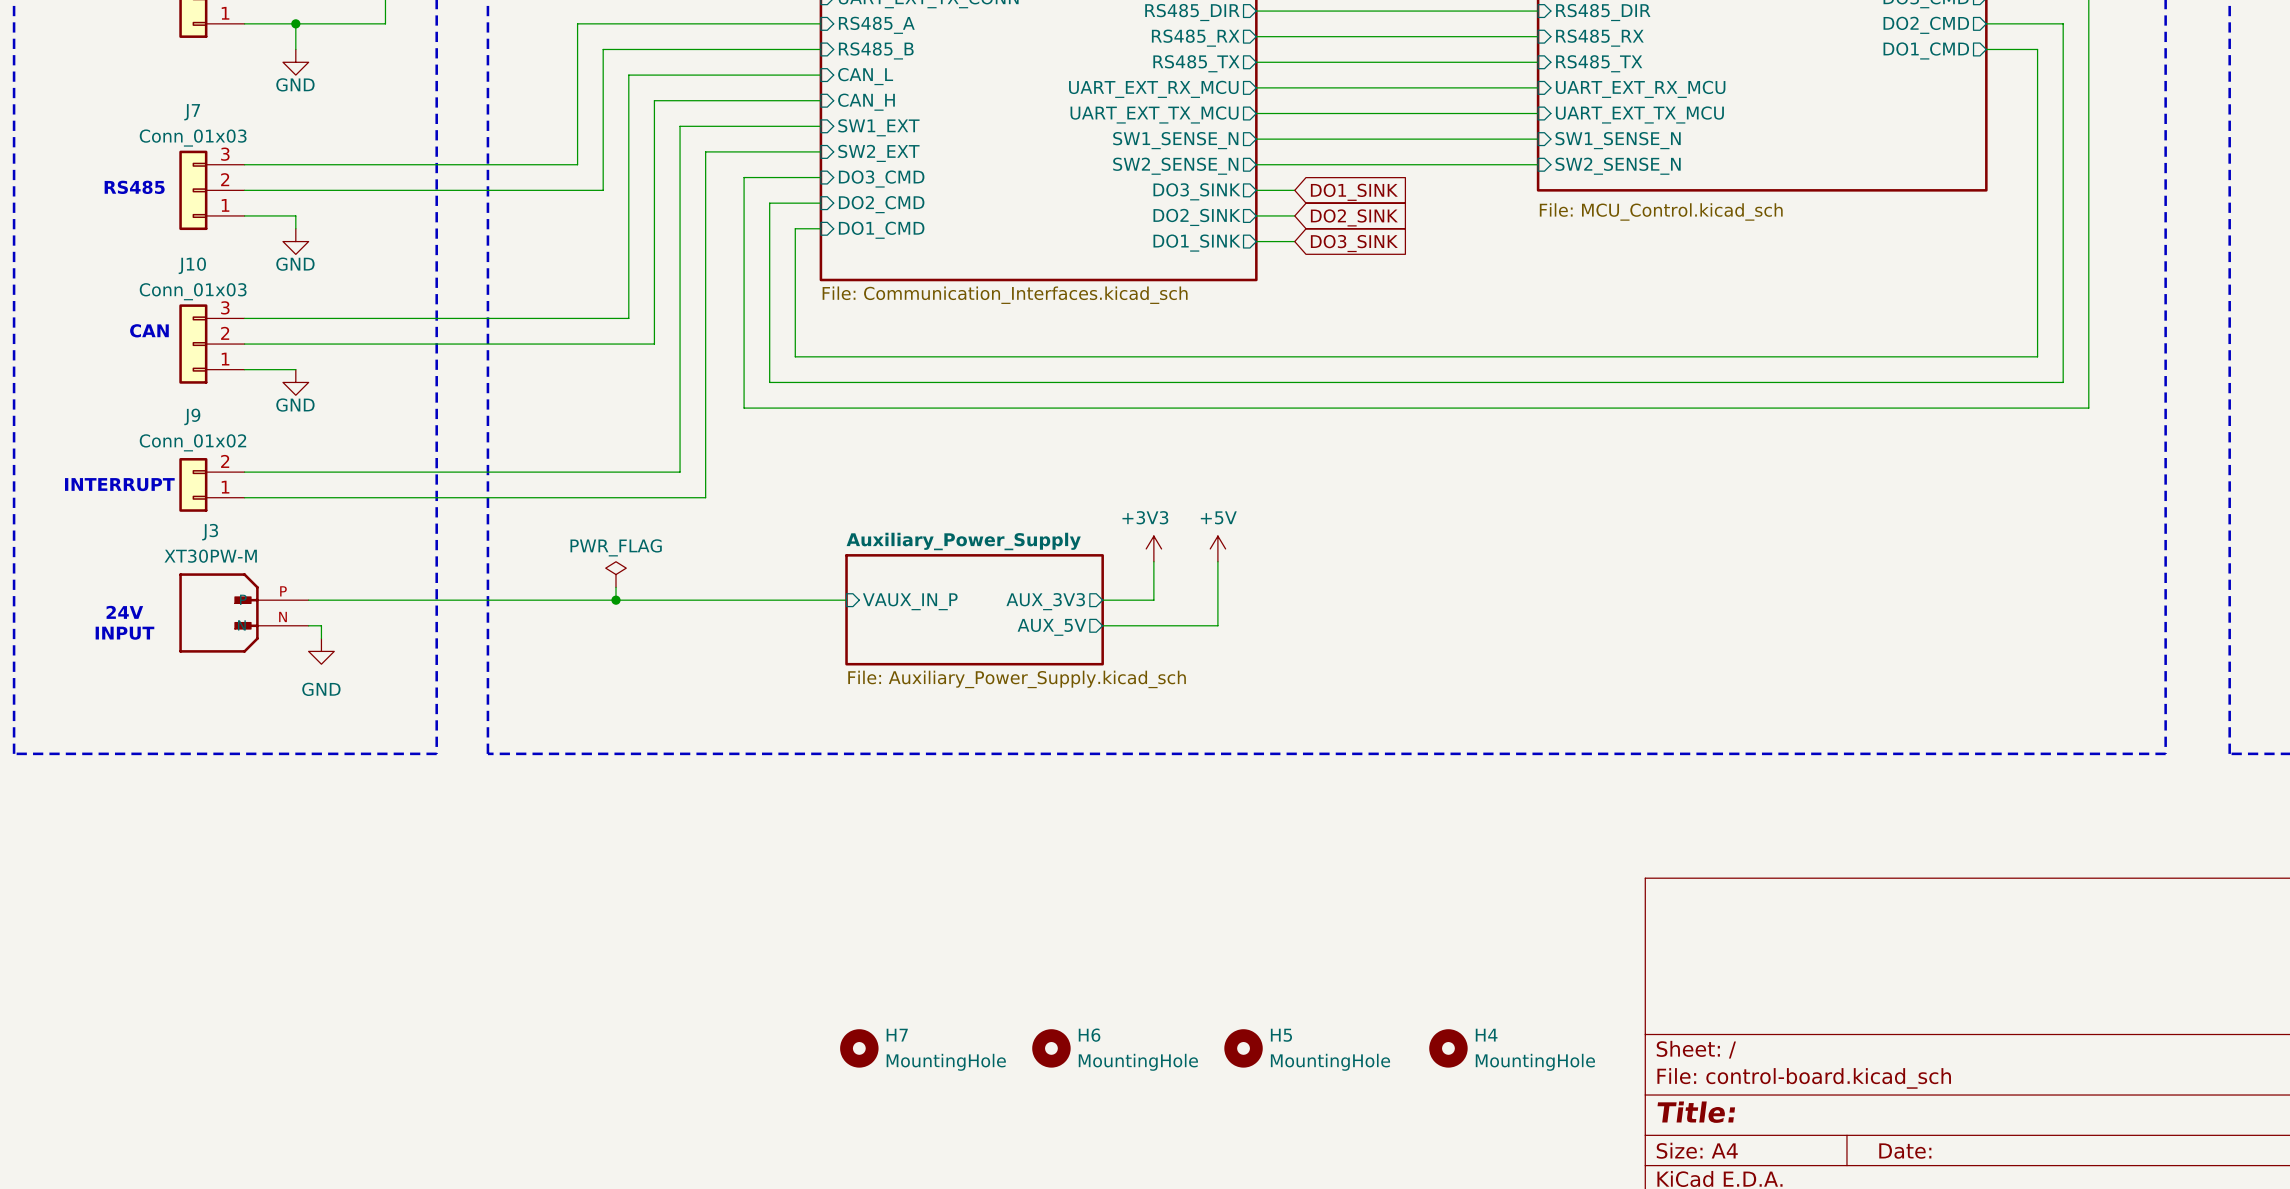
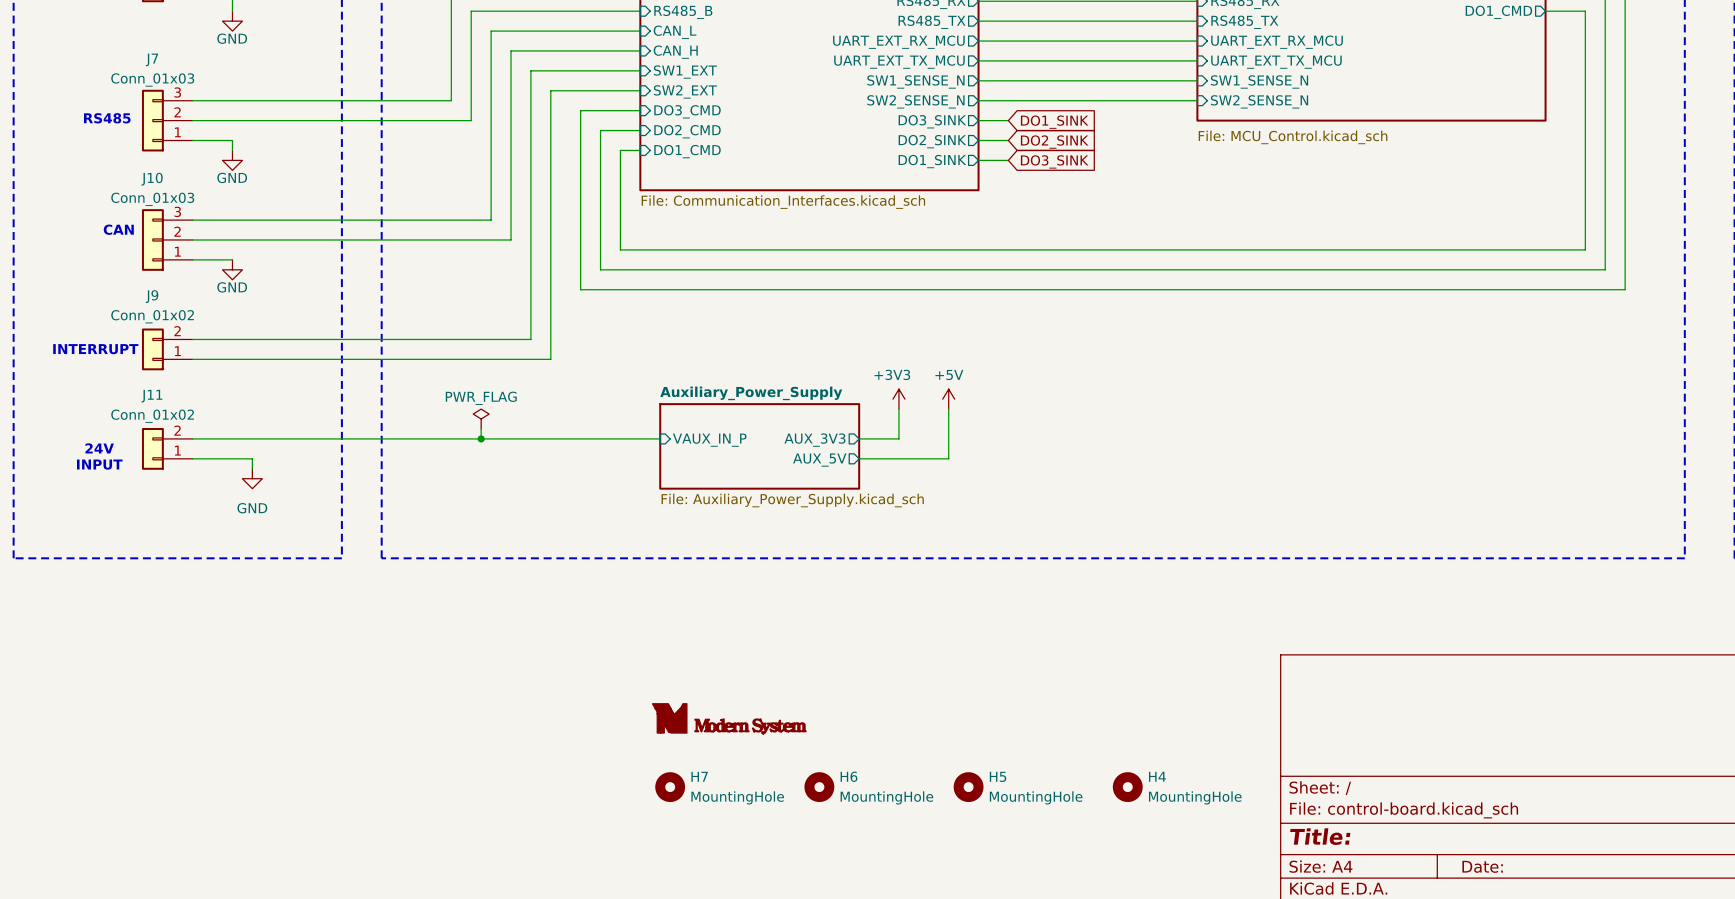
J11: none -> Conn_01x02 (167, 448)
J3: XT30PW-M (243, 612) -> none
power symbol: none -> (729, 718)

